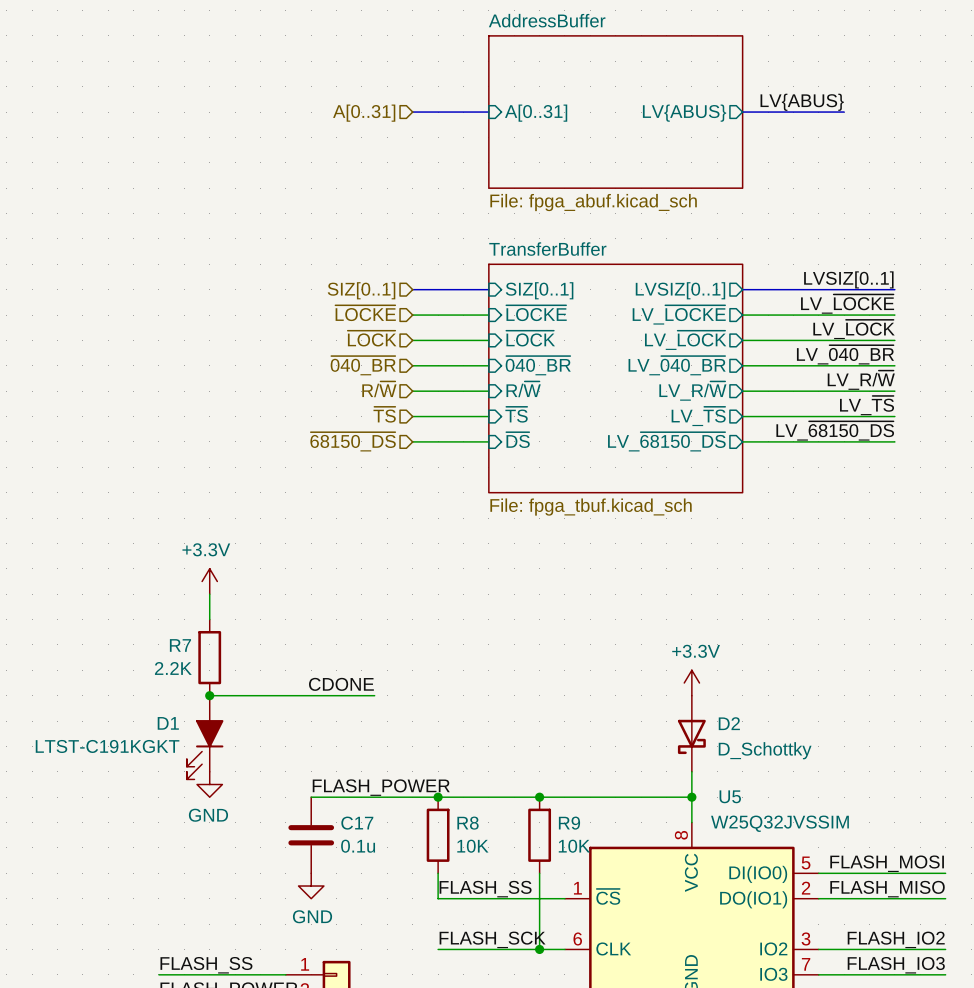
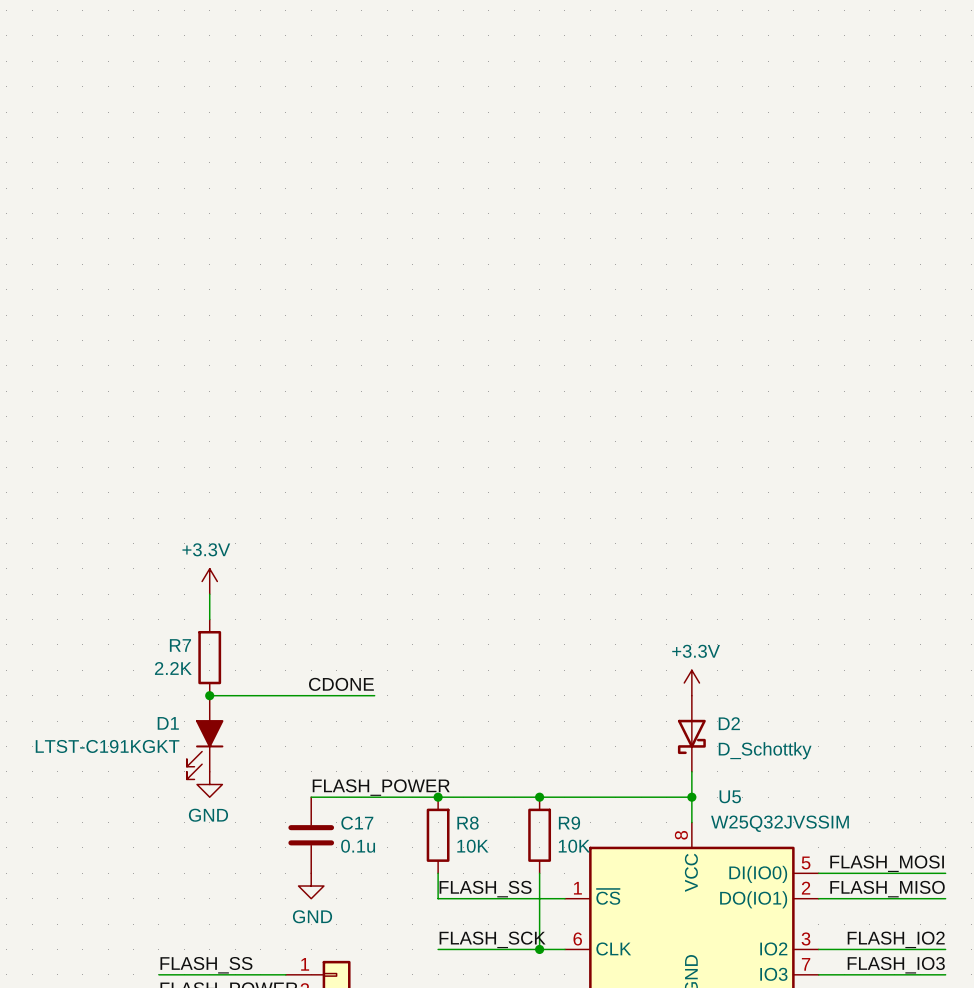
label: LV{ABUS} (802, 102) -> none
bus: (412, 112) (488, 112) -> none
sheet AddressBuffer: File: fpga_abuf.kicad_sch (615, 112) -> none
bus: (742, 112) (844, 112) -> none
hierarchical label: A[0..31] (364, 113) -> none
sheet pin: A[0..31] (536, 113) -> none
sheet pin: LV{ABUS} (684, 113) -> none
label: LVSIZ[0..1] (848, 279) -> none
bus: (412, 289) (488, 289) -> none
bus: (742, 289) (894, 289) -> none
hierarchical label: SIZ[0..1] (361, 290) -> none
sheet pin: SIZ[0..1] (539, 290) -> none
sheet pin: LVSIZ[0..1] (680, 290) -> none
label: LV_~{LOCKE} (847, 304) -> none
hierarchical label: ~{LOCKE} (365, 313) -> none
sheet pin: ~{LOCKE} (536, 313) -> none
sheet pin: LV_~{LOCKE} (679, 314) -> none
wire: (412, 315) (488, 315) -> none
wire: (742, 315) (894, 315) -> none
label: LV_~{LOCK} (854, 329) -> none
hierarchical label: ~{LOCK} (372, 338) -> none
sheet pin: ~{LOCK} (530, 338) -> none
wire: (412, 340) (488, 340) -> none
sheet pin: LV_~{LOCK} (685, 340) -> none
wire: (742, 340) (894, 340) -> none
label: LV_~{040_BR} (845, 354) -> none
hierarchical label: ~{040_BR} (363, 365) -> none
wire: (412, 365) (488, 365) -> none
sheet pin: ~{040_BR} (538, 365) -> none
sheet pin: LV_~{040_BR} (677, 365) -> none
wire: (742, 365) (894, 365) -> none
sheet TransferBuffer: File: fpga_tbuf.kicad_sch (615, 378) -> none
label: LV_R/~{W} (861, 380) -> none
hierarchical label: R/~{W} (379, 389) -> none
sheet pin: R/~{W} (523, 389) -> none
wire: (412, 391) (488, 391) -> none
sheet pin: LV_R/~{W} (692, 391) -> none
wire: (742, 391) (894, 391) -> none
label: LV_~{TS} (867, 405) -> none
hierarchical label: ~{TS} (384, 414) -> none
sheet pin: ~{TS} (516, 414) -> none
wire: (412, 416) (488, 416) -> none
sheet pin: LV_~{TS} (698, 416) -> none
wire: (742, 416) (894, 416) -> none
label: LV_~{68150_DS} (835, 430) -> none
sheet pin: ~{DS} (517, 440) -> none
hierarchical label: ~{68150_DS} (353, 441) -> none
wire: (412, 441) (488, 441) -> none
sheet pin: LV_~{68150_DS} (666, 441) -> none
wire: (742, 441) (894, 441) -> none

